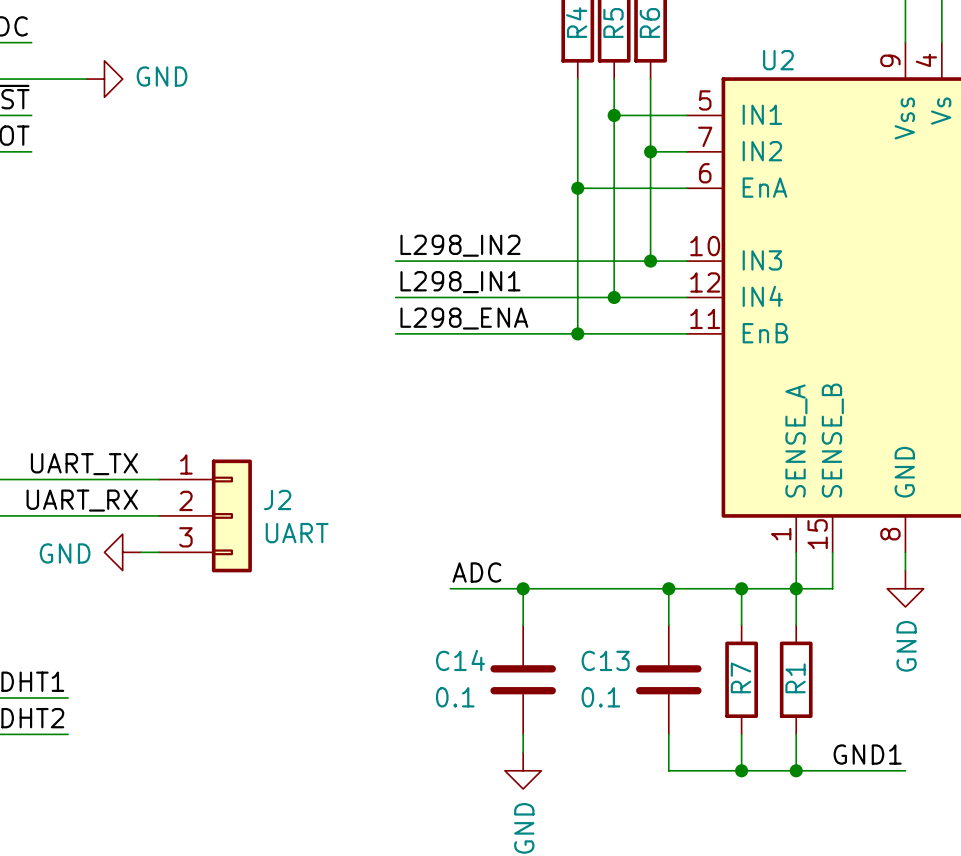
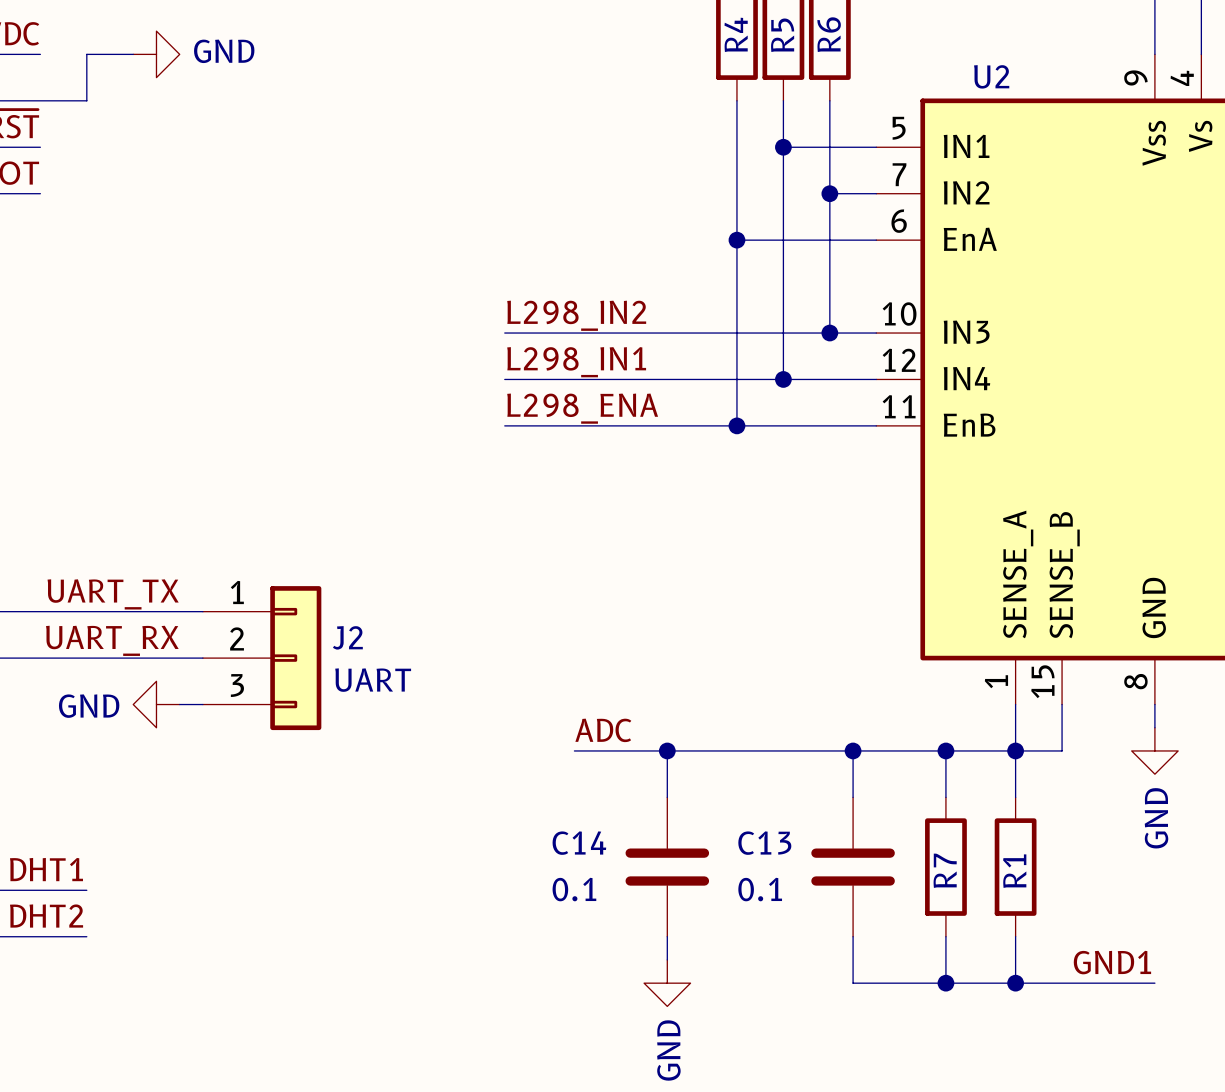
wire: (68, 79) (86, 79) -> (86, 100) (86, 54) (133, 54)
power symbol position: GND (104, 79) -> GND (156, 54)

